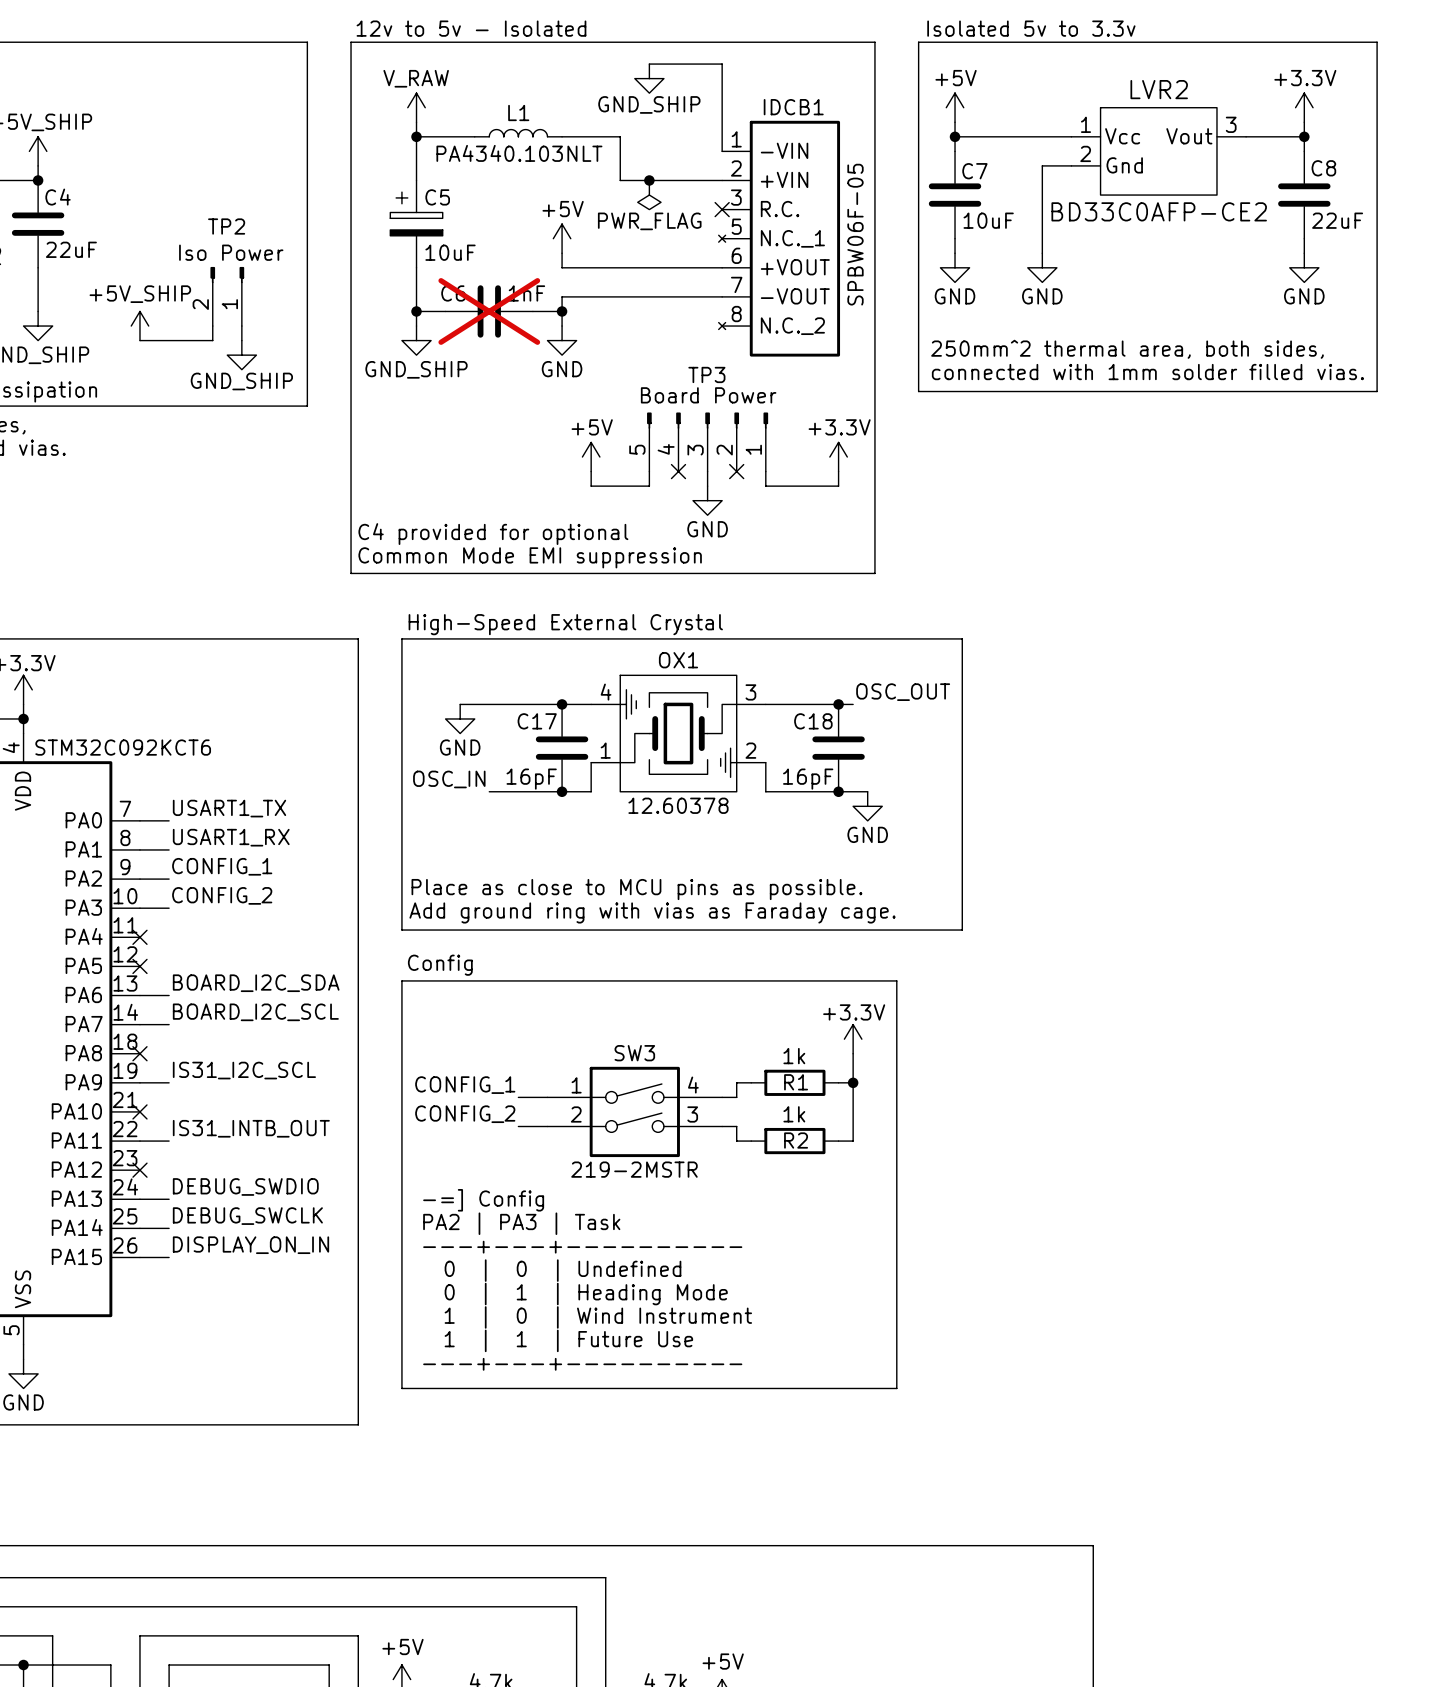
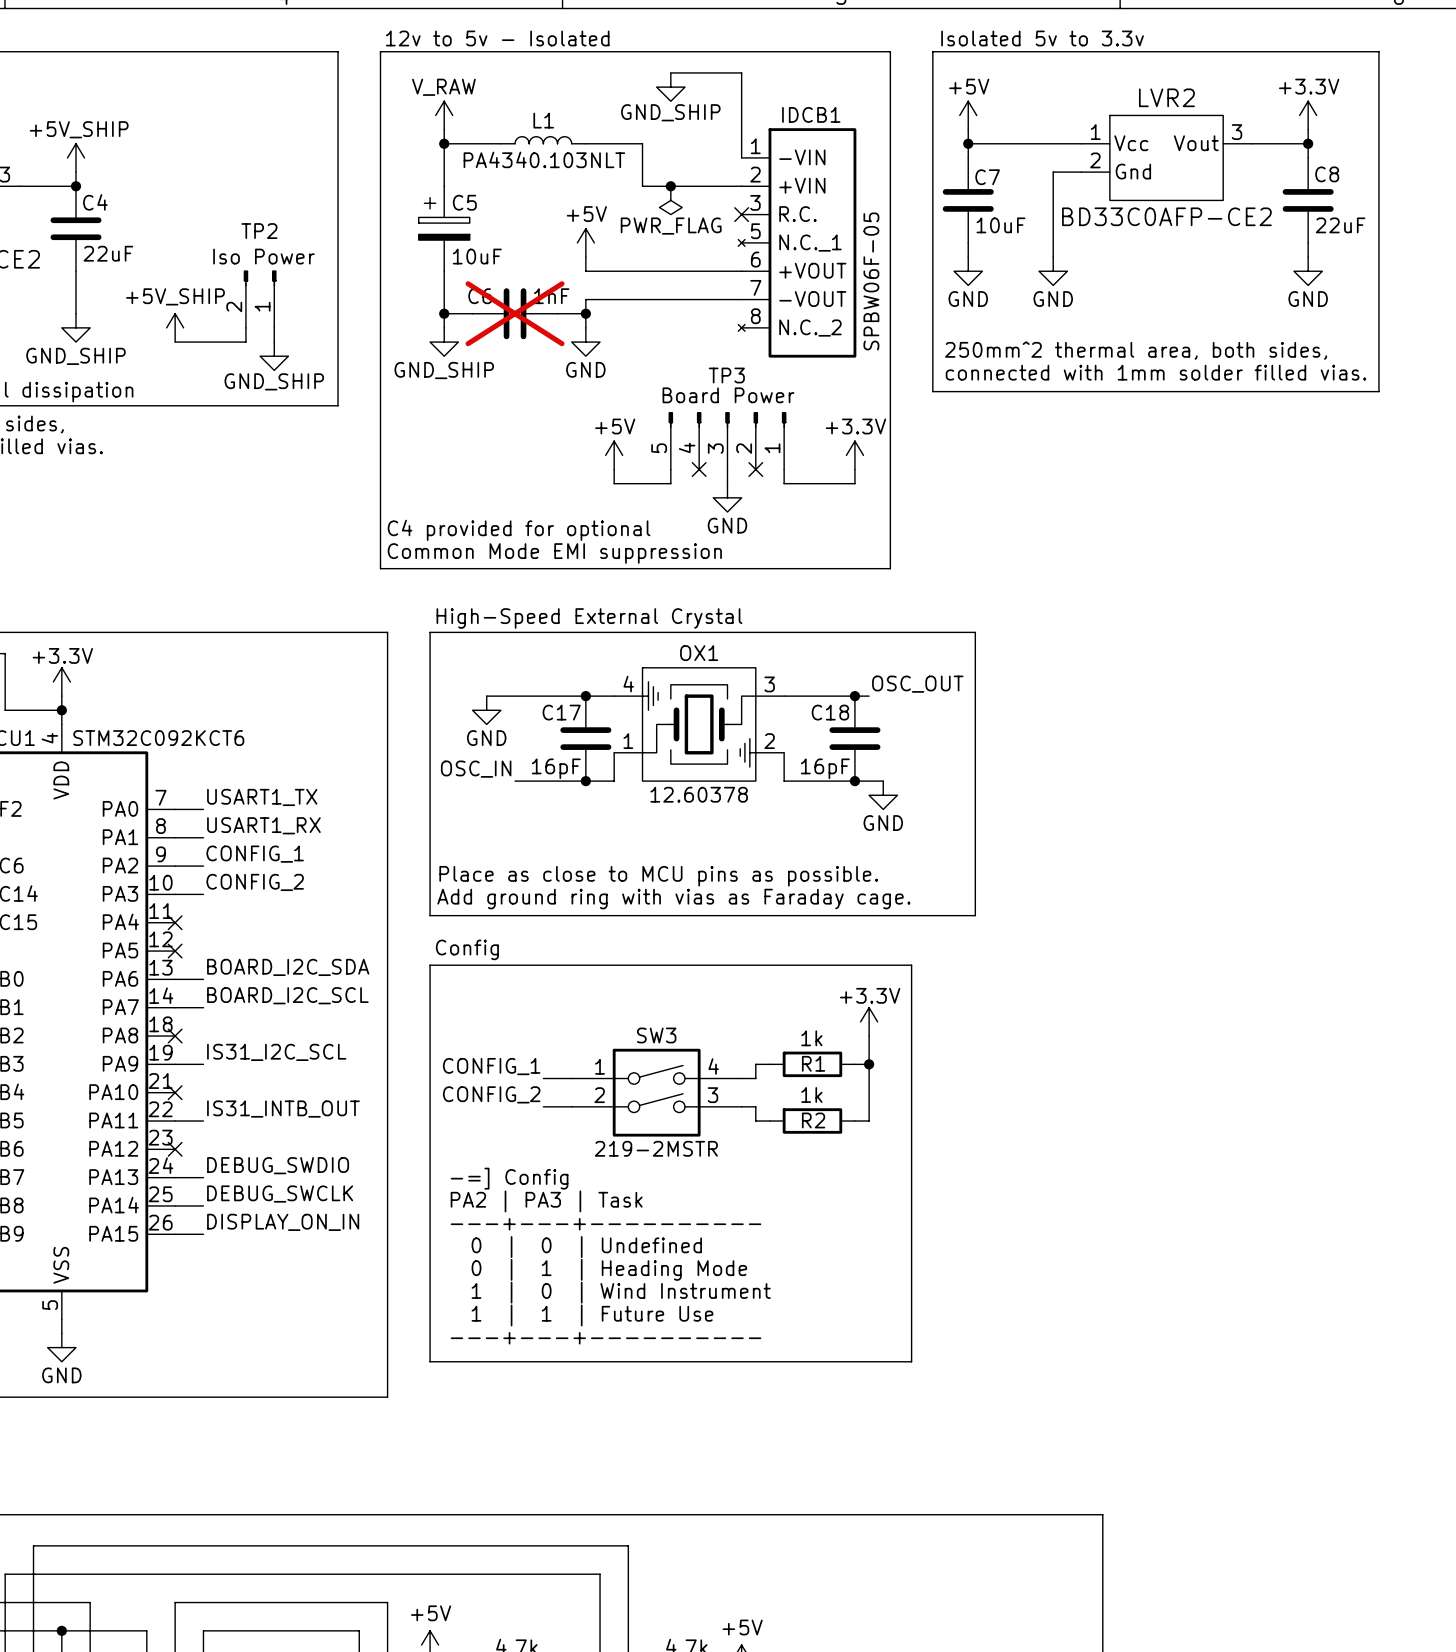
IDCB1 value position: SPBW06F-05 (855, 234) -> SPBW06F-05 (871, 281)

